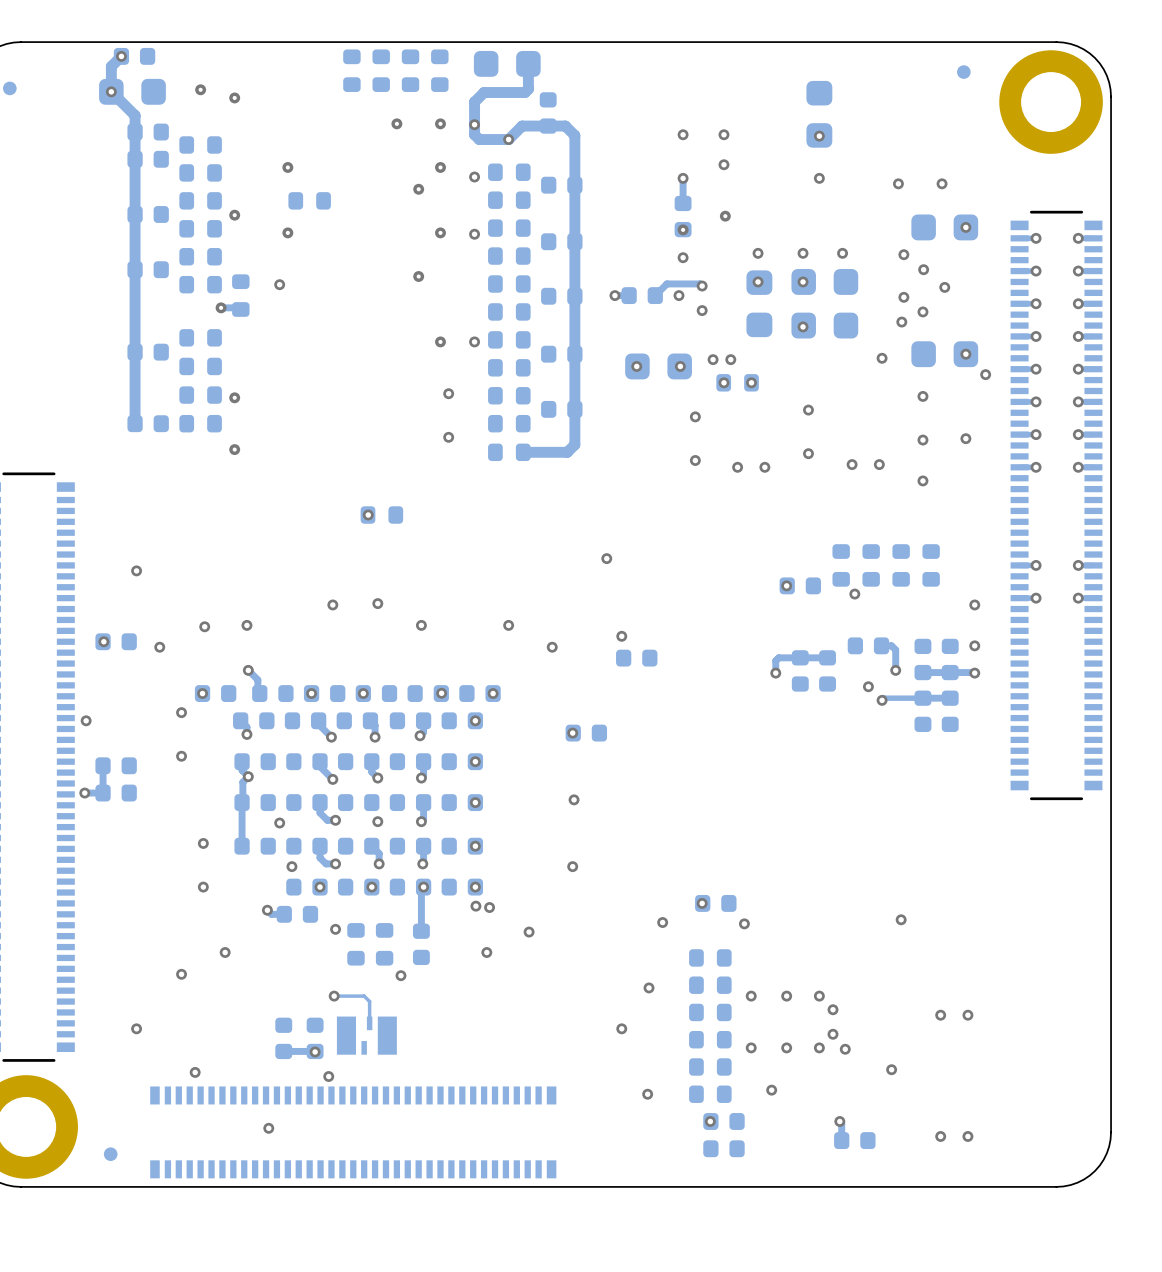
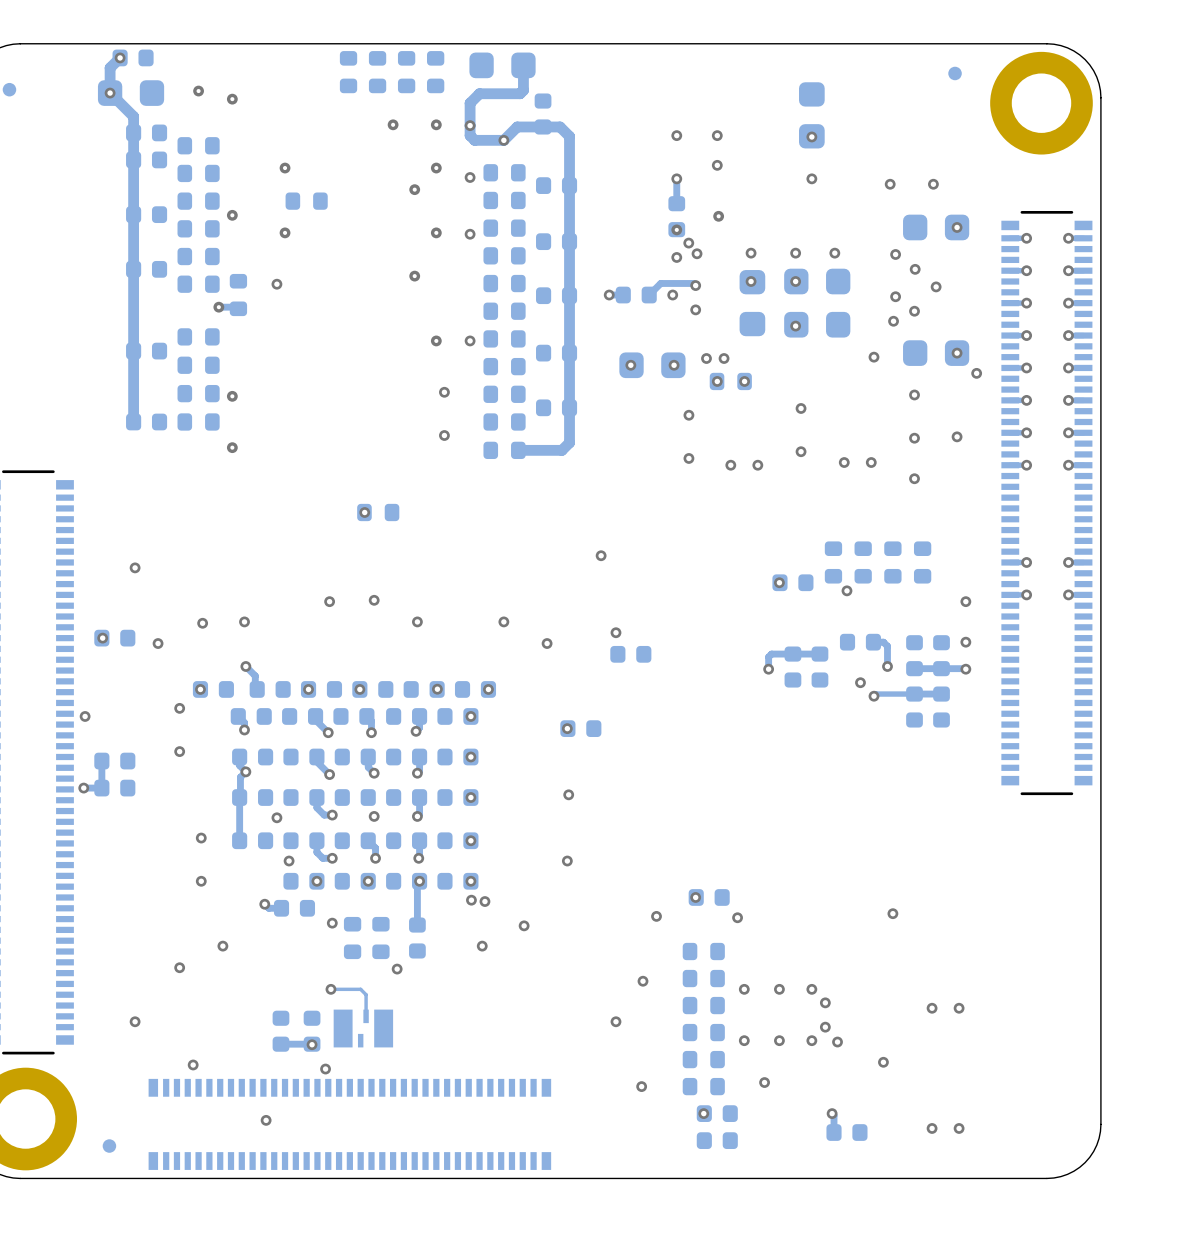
via: none -> (688, 243)
via: none -> (697, 253)

